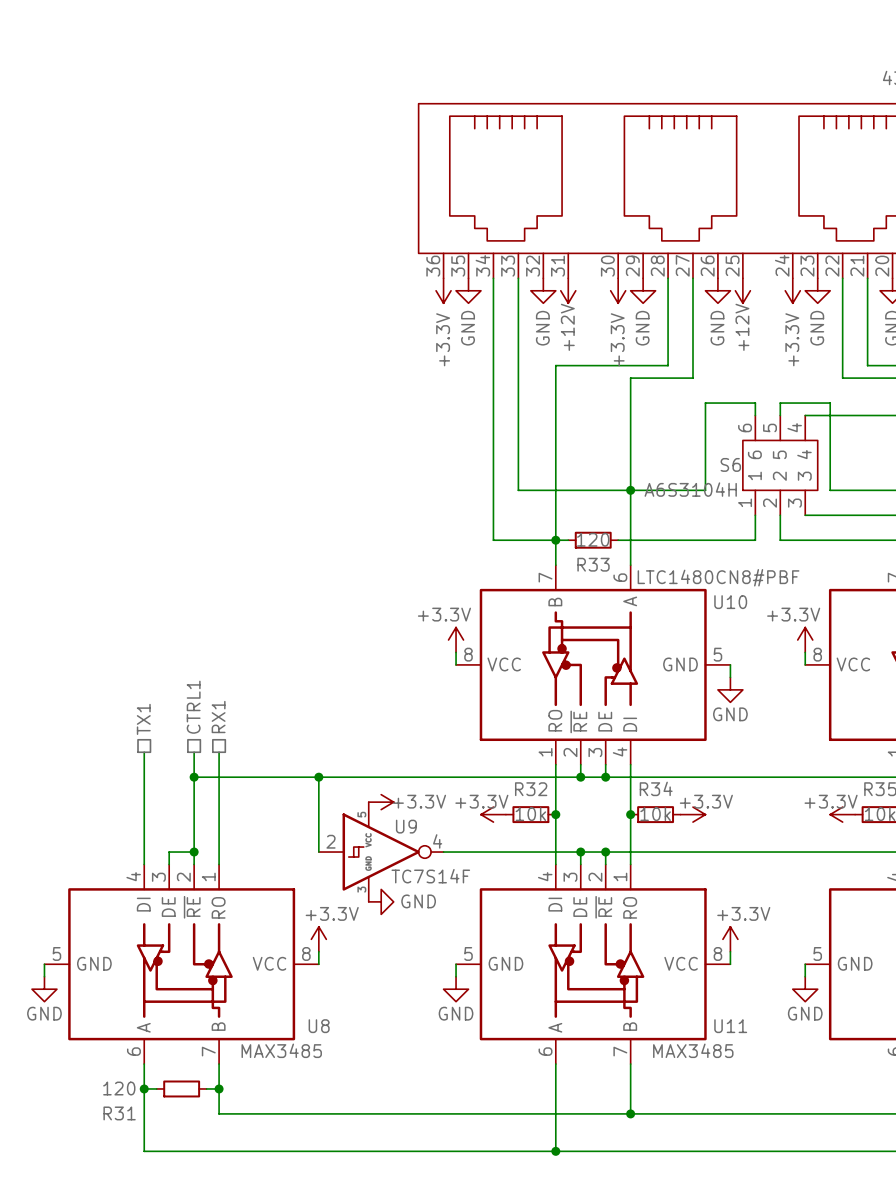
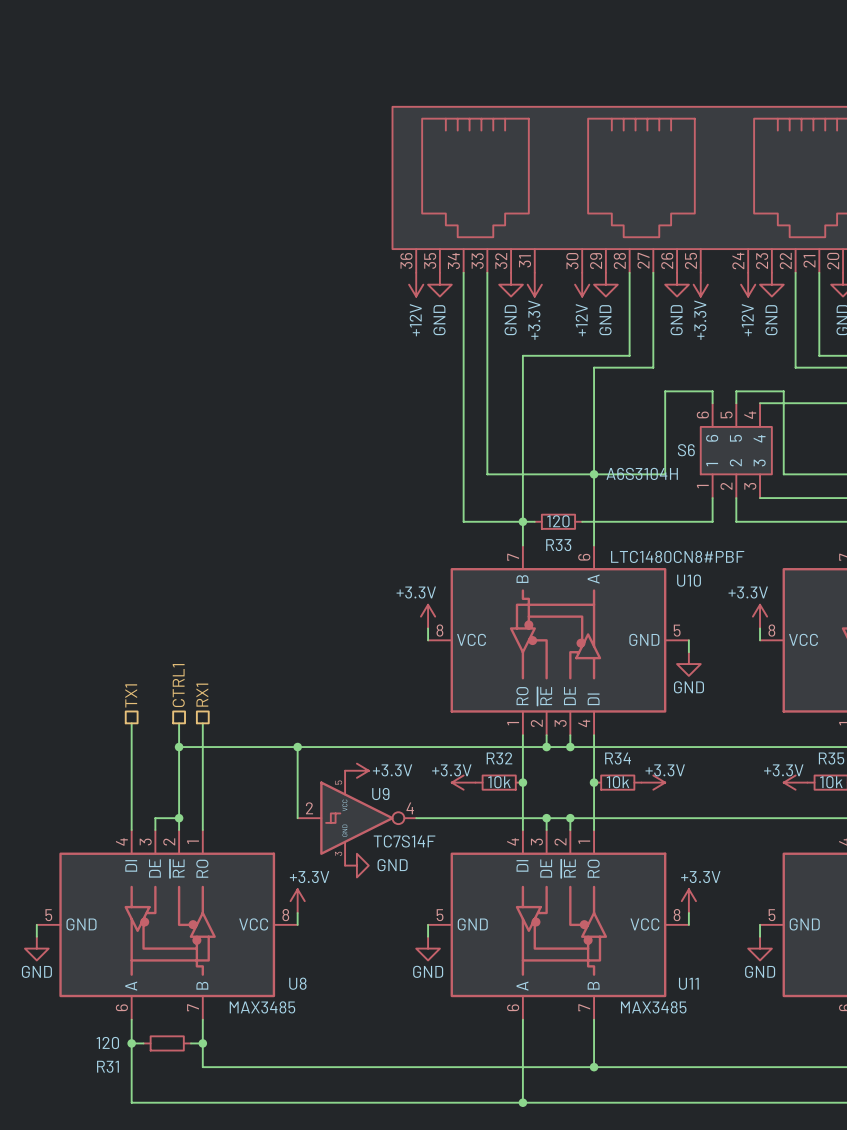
power symbol: +3.3V (443, 290) -> +12V (416, 284)
power symbol: +12V (568, 290) -> +3.3V (534, 284)
power symbol: +3.3V (618, 290) -> +12V (582, 284)
power symbol: +12V (742, 290) -> +3.3V (700, 284)
power symbol: +3.3V (792, 290) -> +12V (748, 284)

